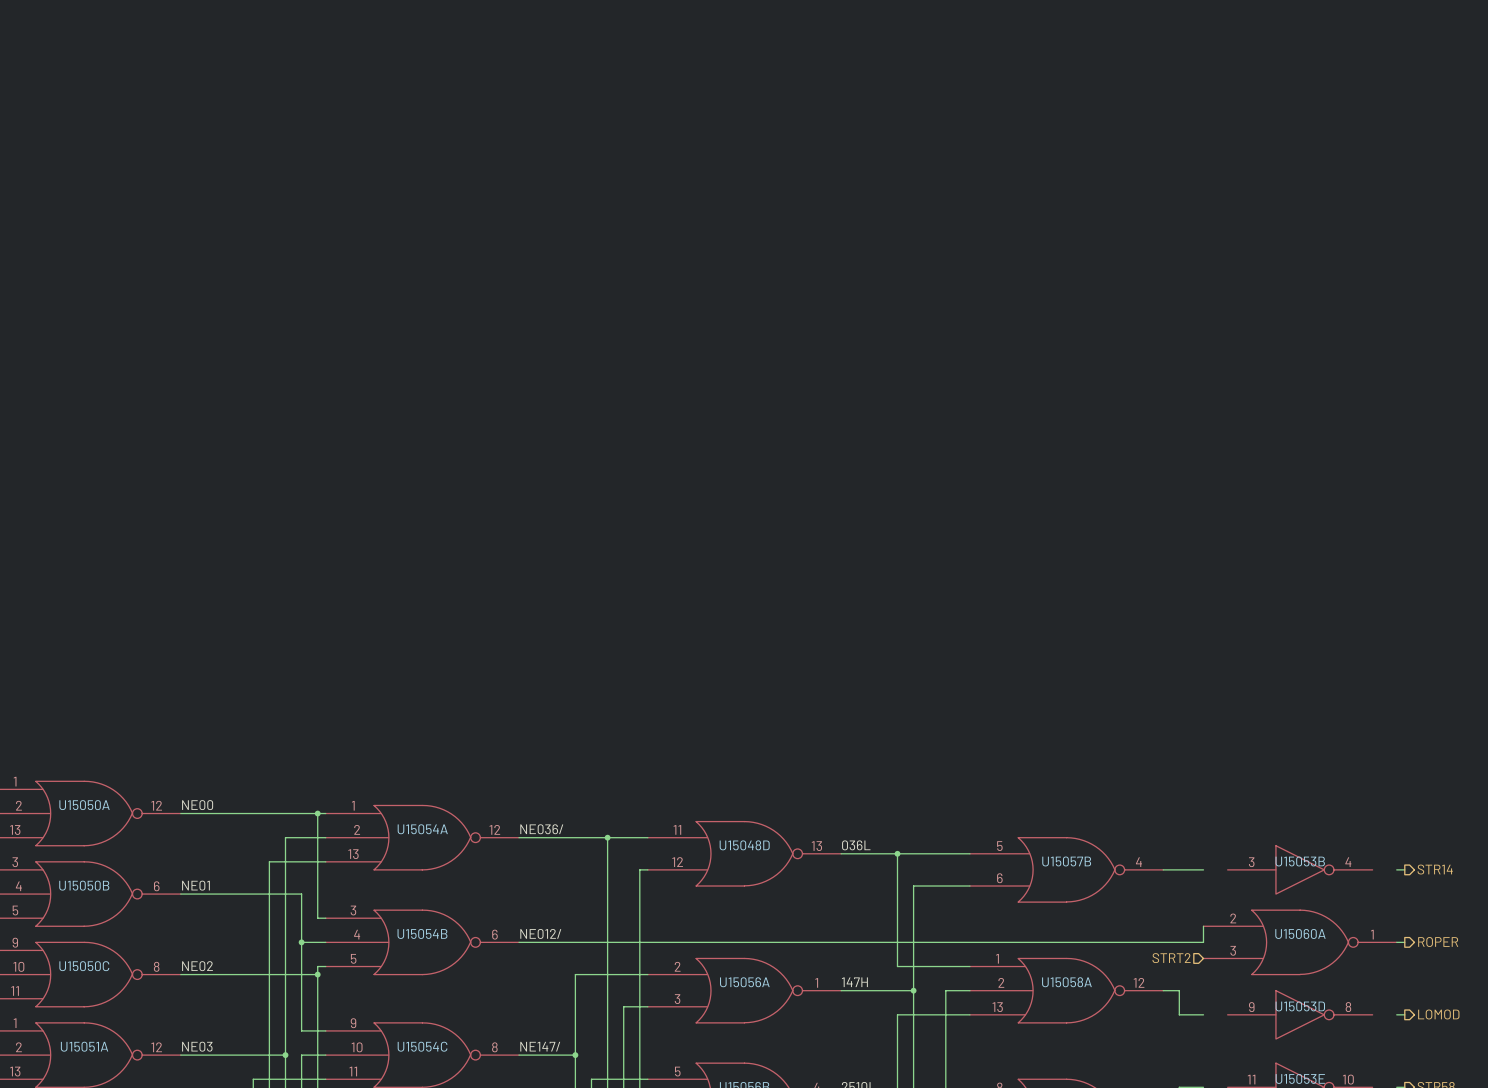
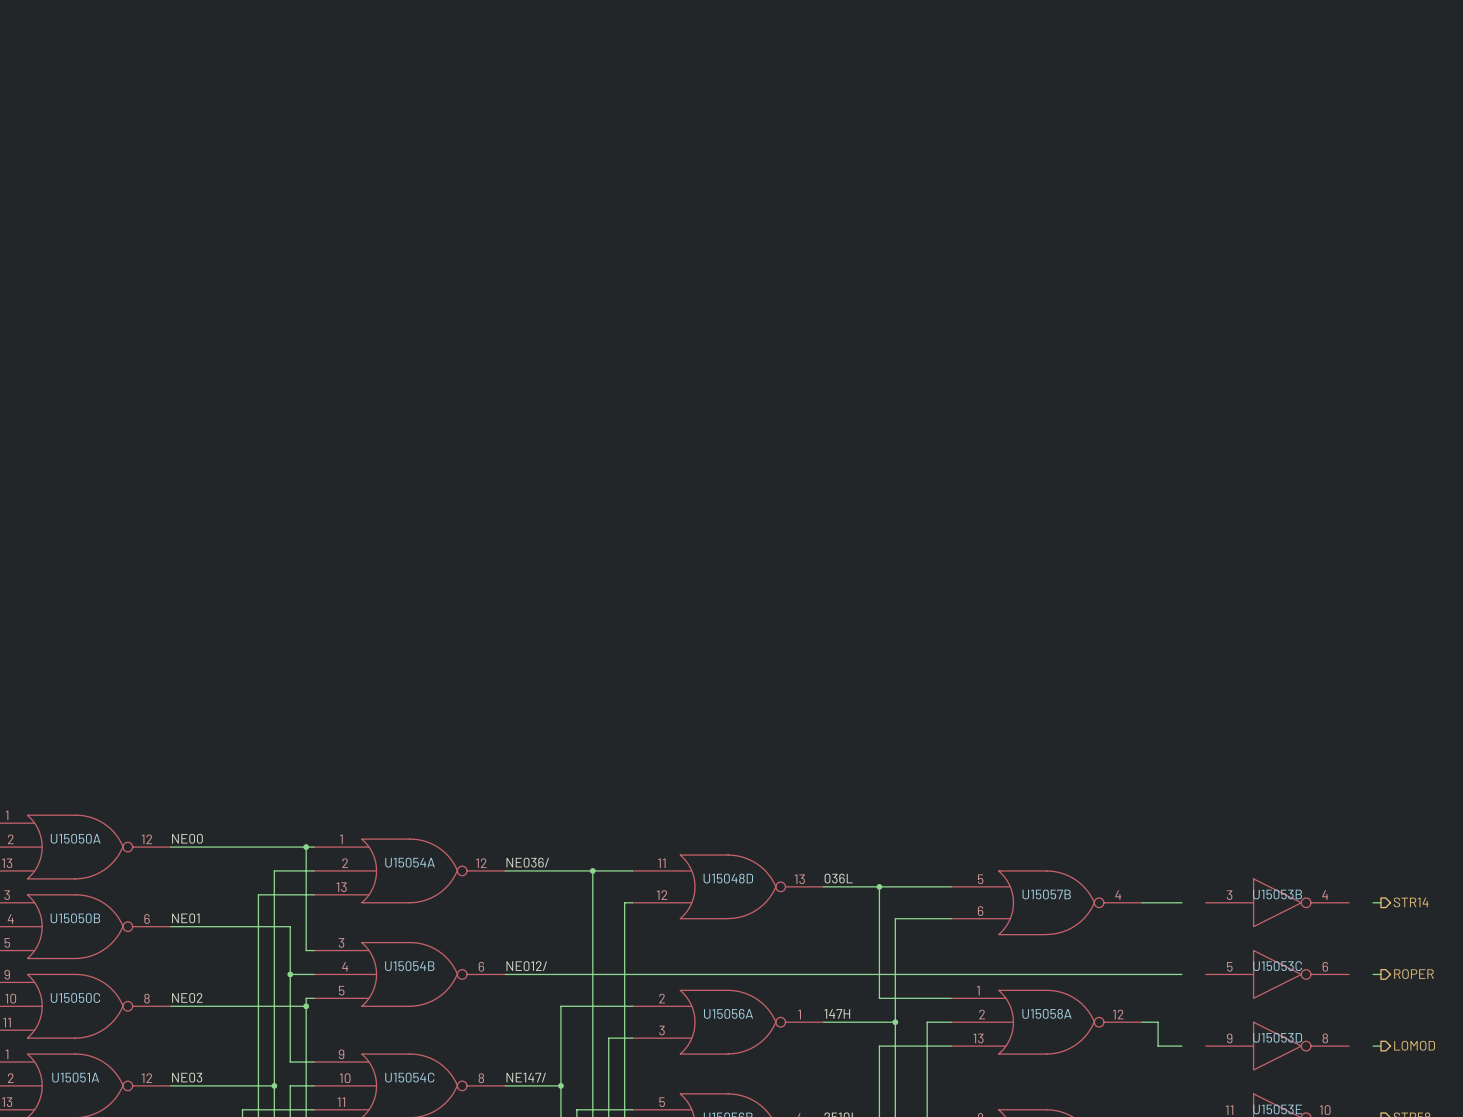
wire: (1203, 926) (1203, 942) -> none
U15060A: (1300, 942) -> none
U15053C: none -> (1277, 974)
hierarchical label: STRT2 (1171, 958) -> none

